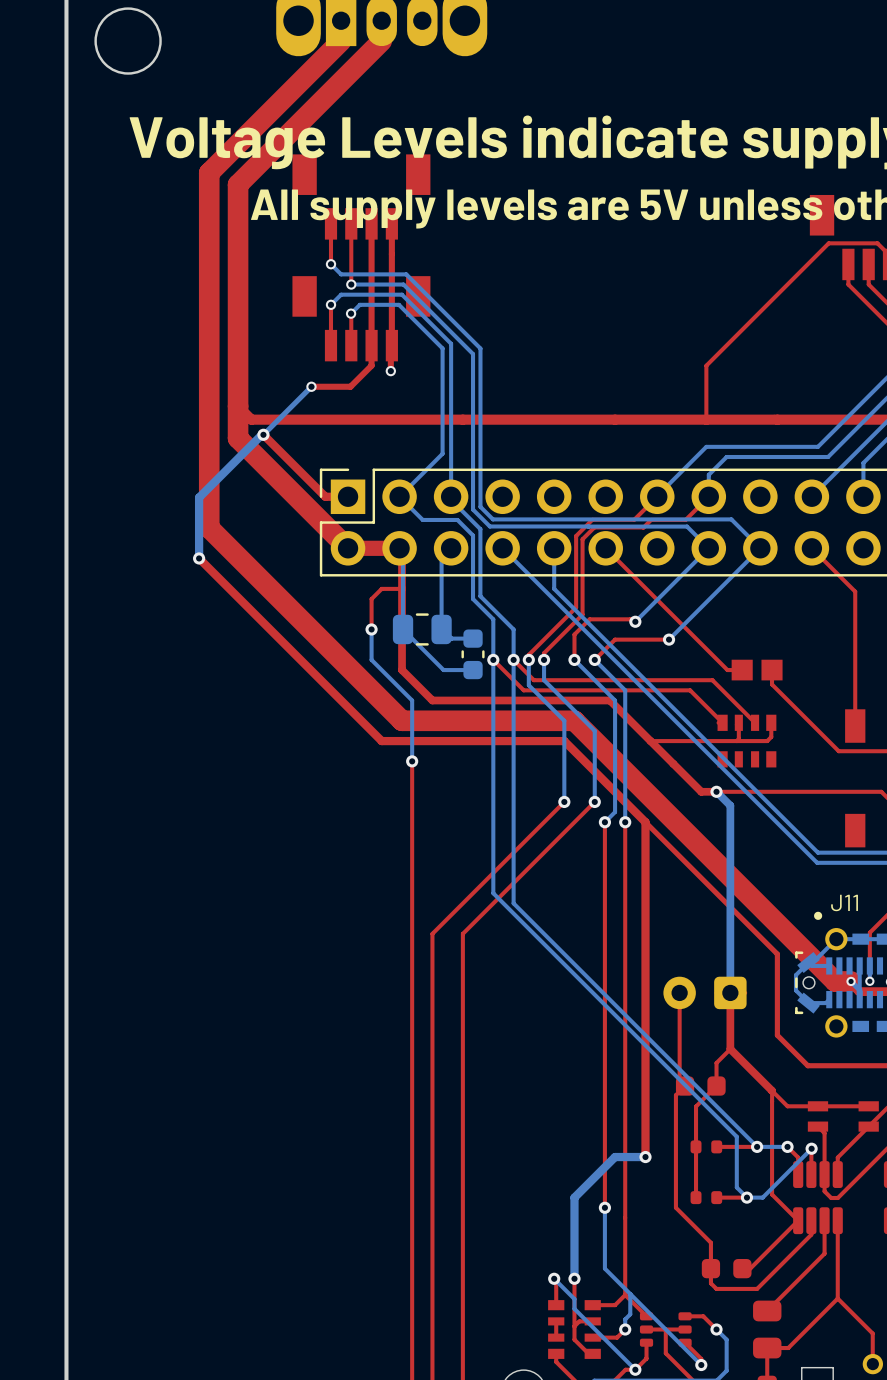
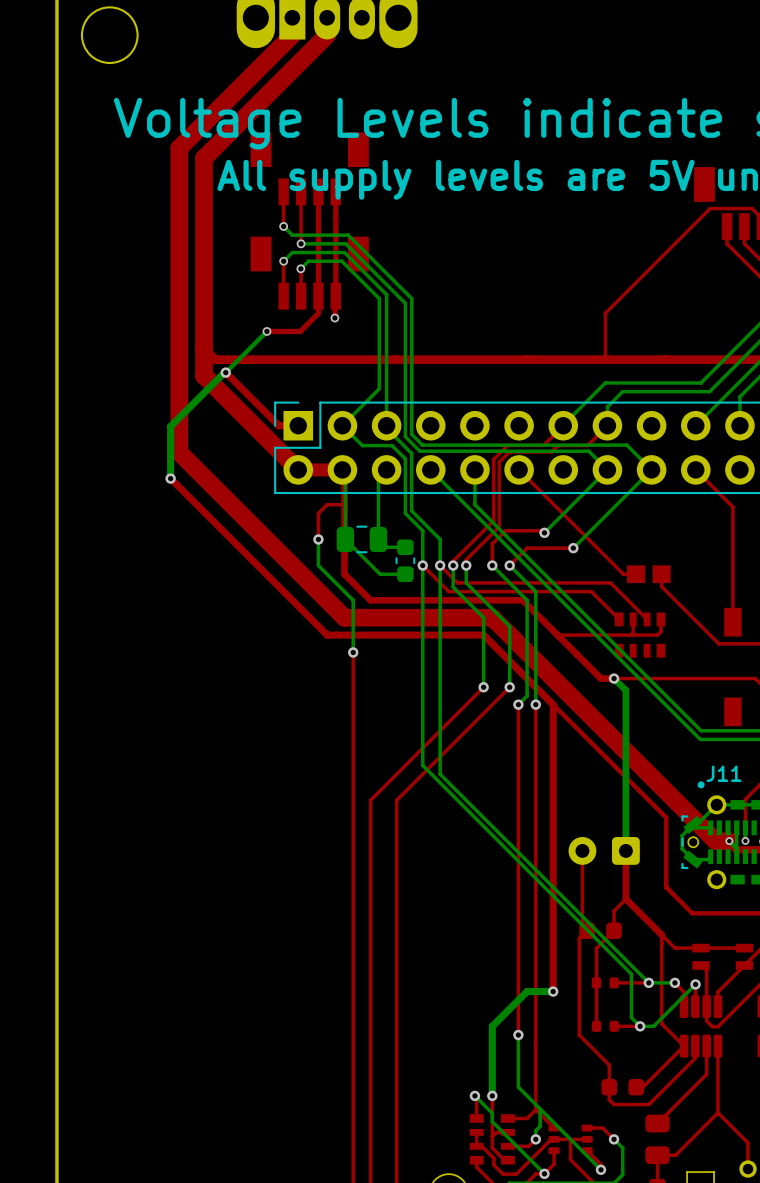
top track: none -> (554, 1139) (551, 1139) (516, 1174) (503, 1174) (493, 1164) (493, 1158) (481, 1146) (476, 1146)

